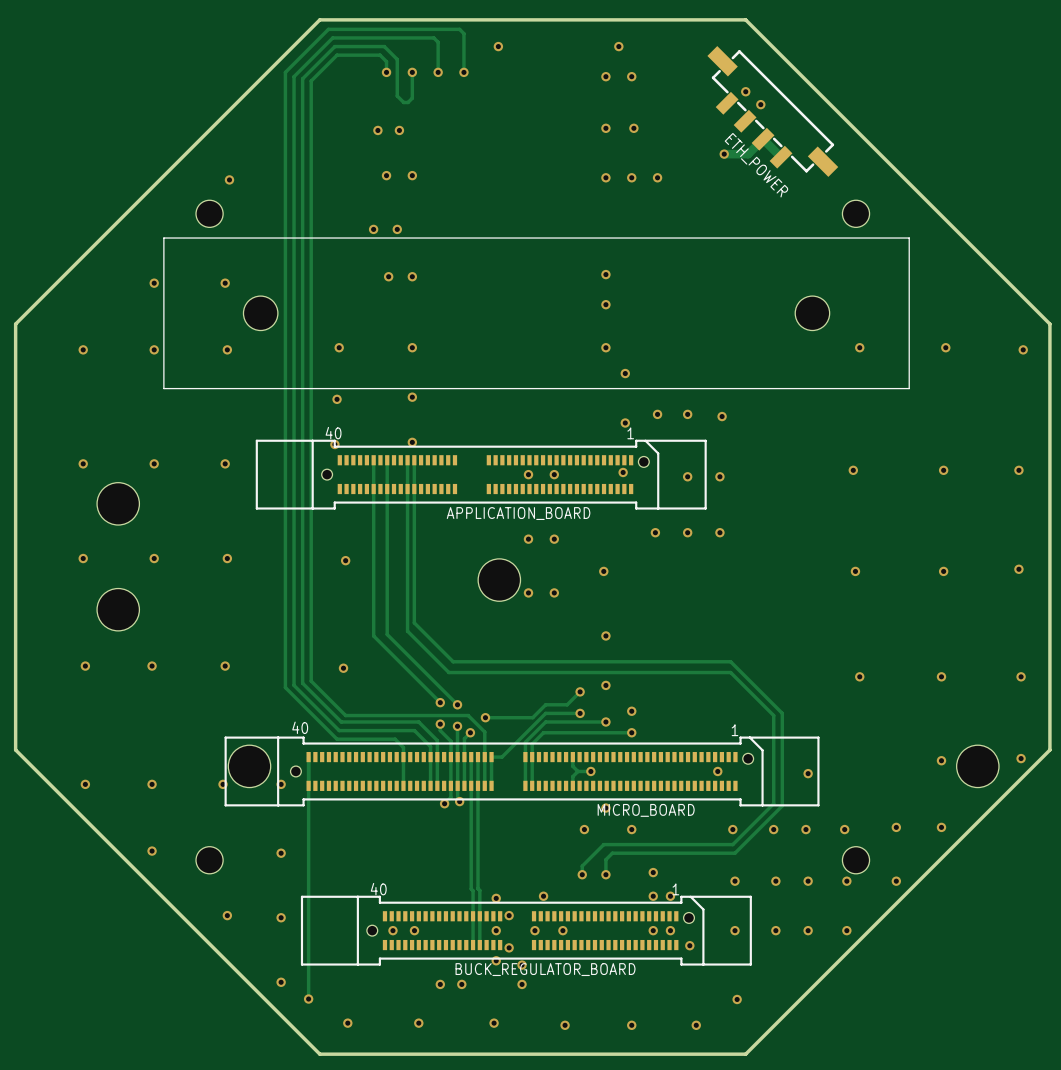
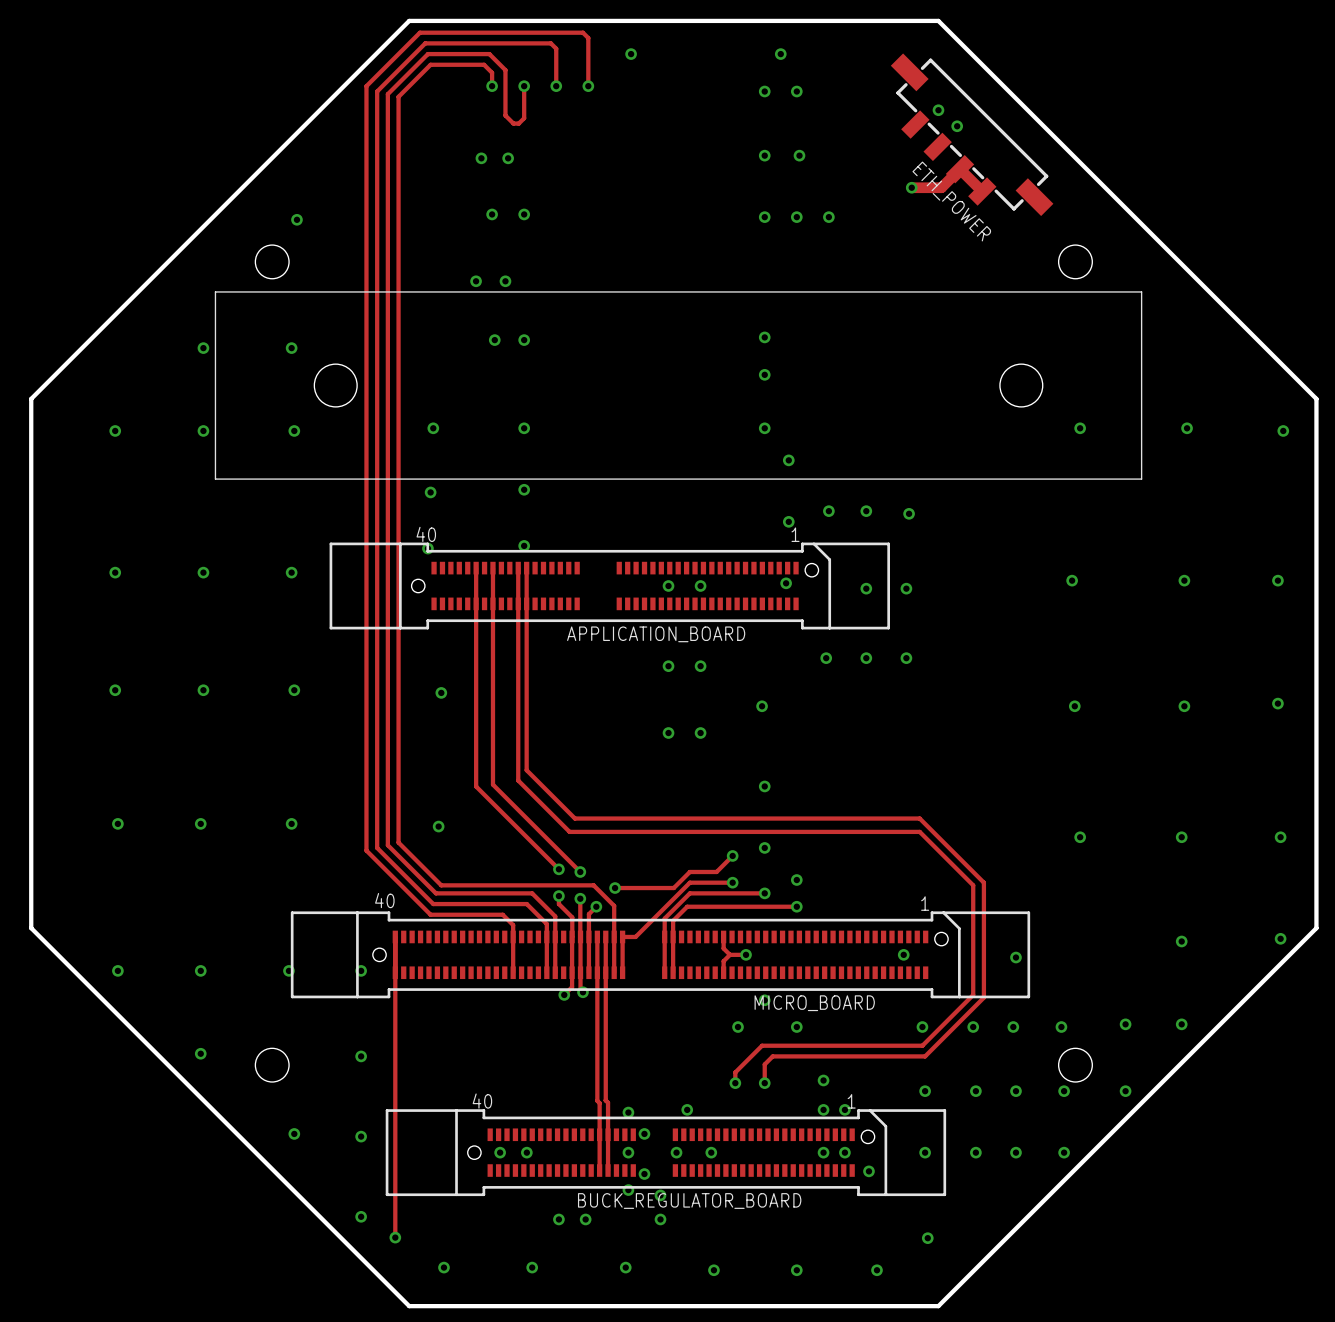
hole: (118, 503) -> none
hole: (499, 580) -> none
hole: (118, 609) -> none
hole: (249, 766) -> none
hole: (977, 766) -> none

